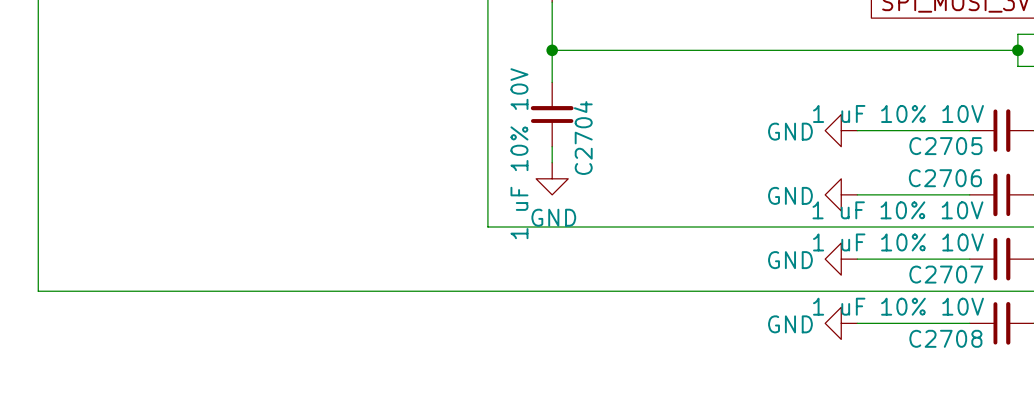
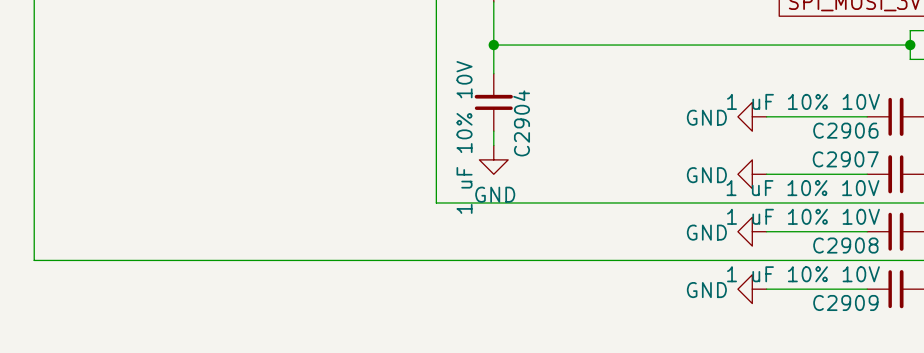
C2704 name: C2704 (583, 138) -> C2904 (521, 123)
C2705 name: C2705 (945, 146) -> C2906 (845, 130)
C2706 name: C2706 (945, 178) -> C2907 (845, 159)
C2707 name: C2707 (946, 274) -> C2908 (845, 245)
C2708 name: C2708 (945, 338) -> C2909 (845, 302)

